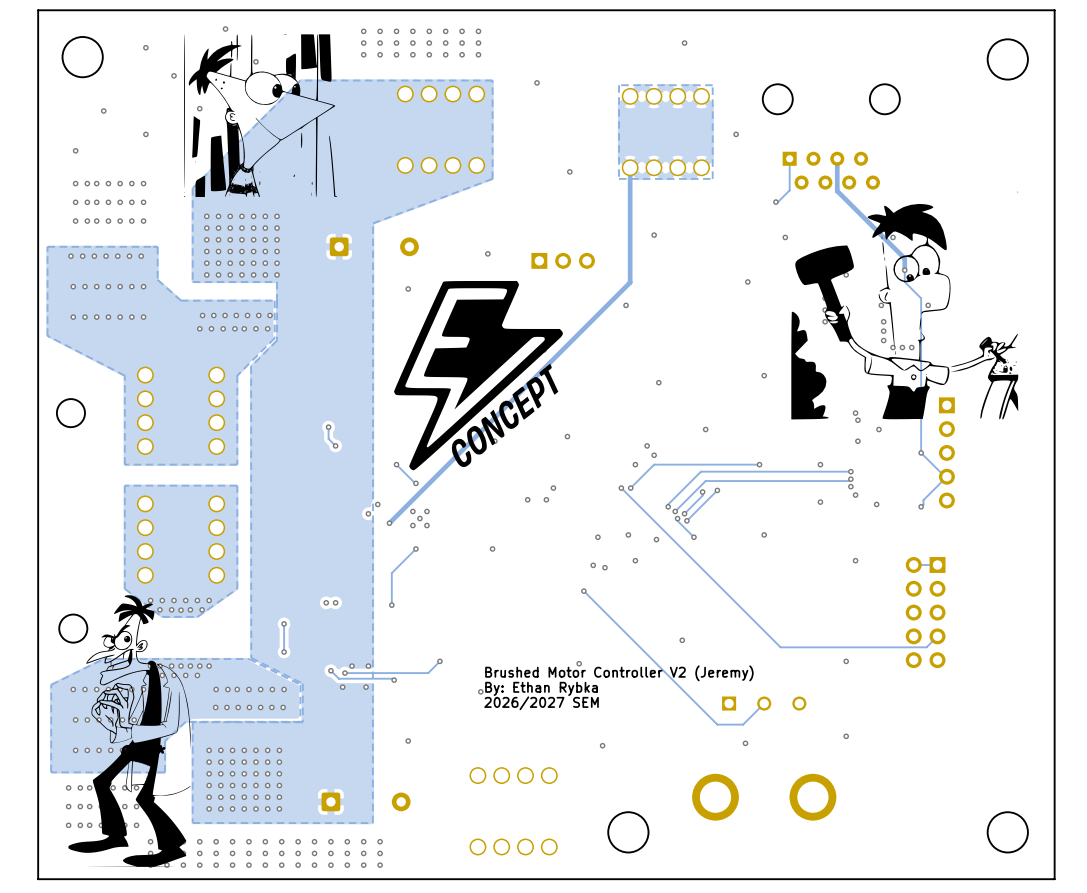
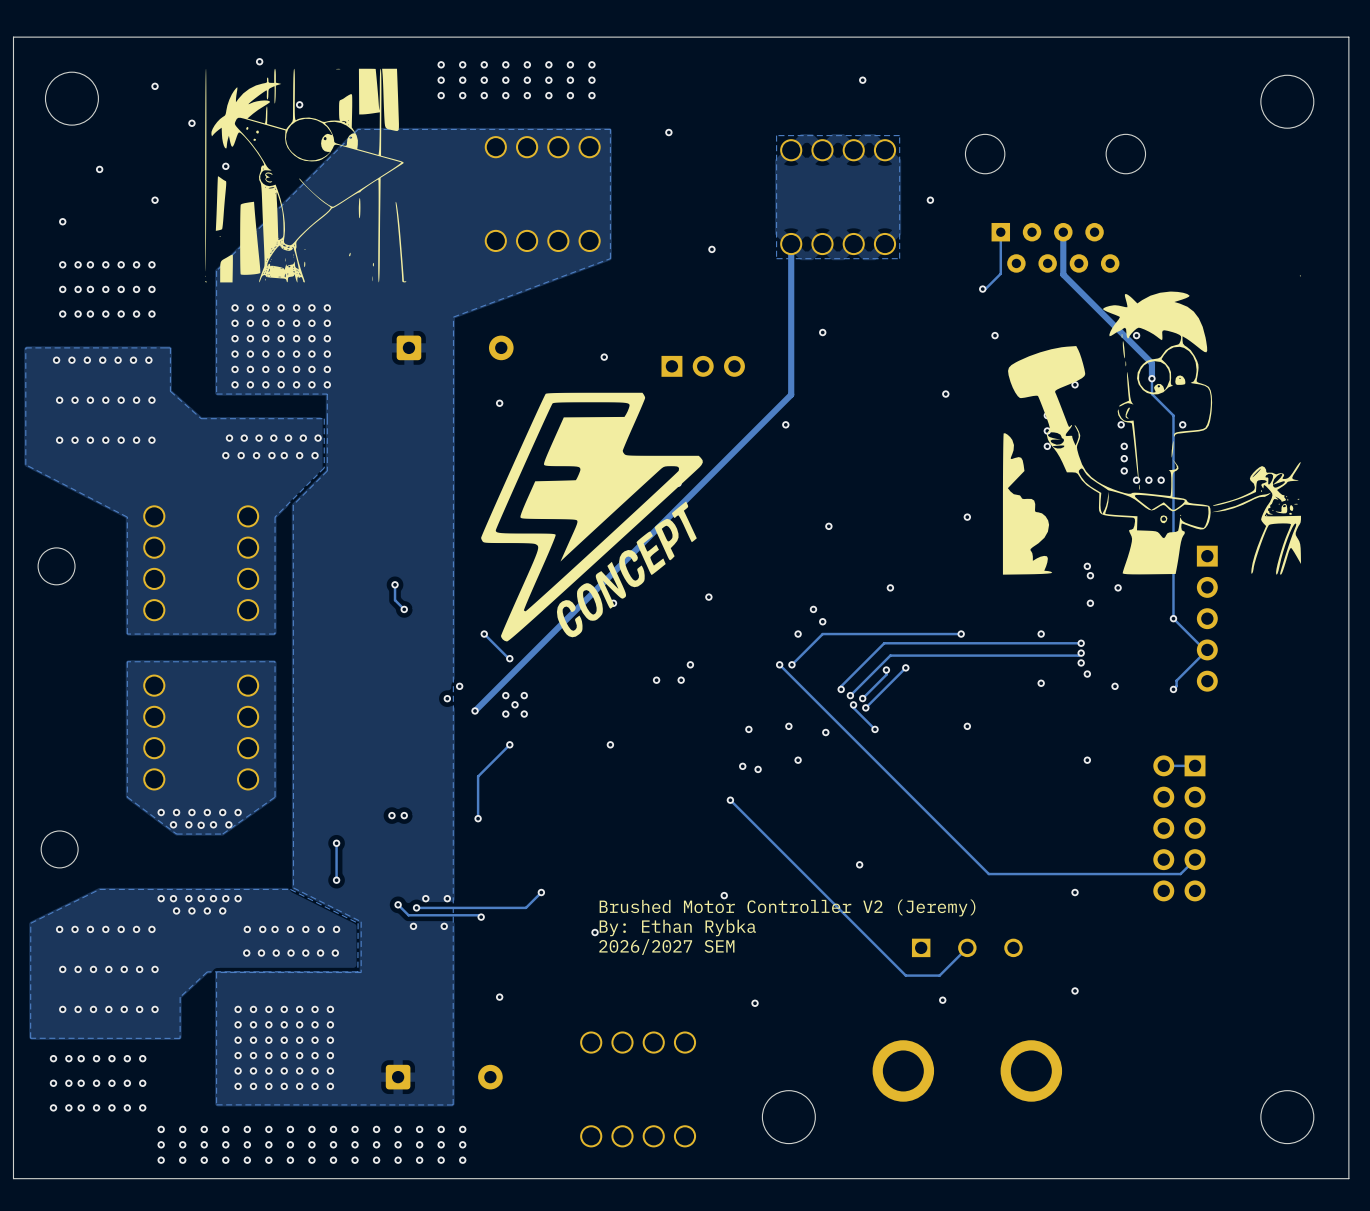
part: (129, 731) -> none

